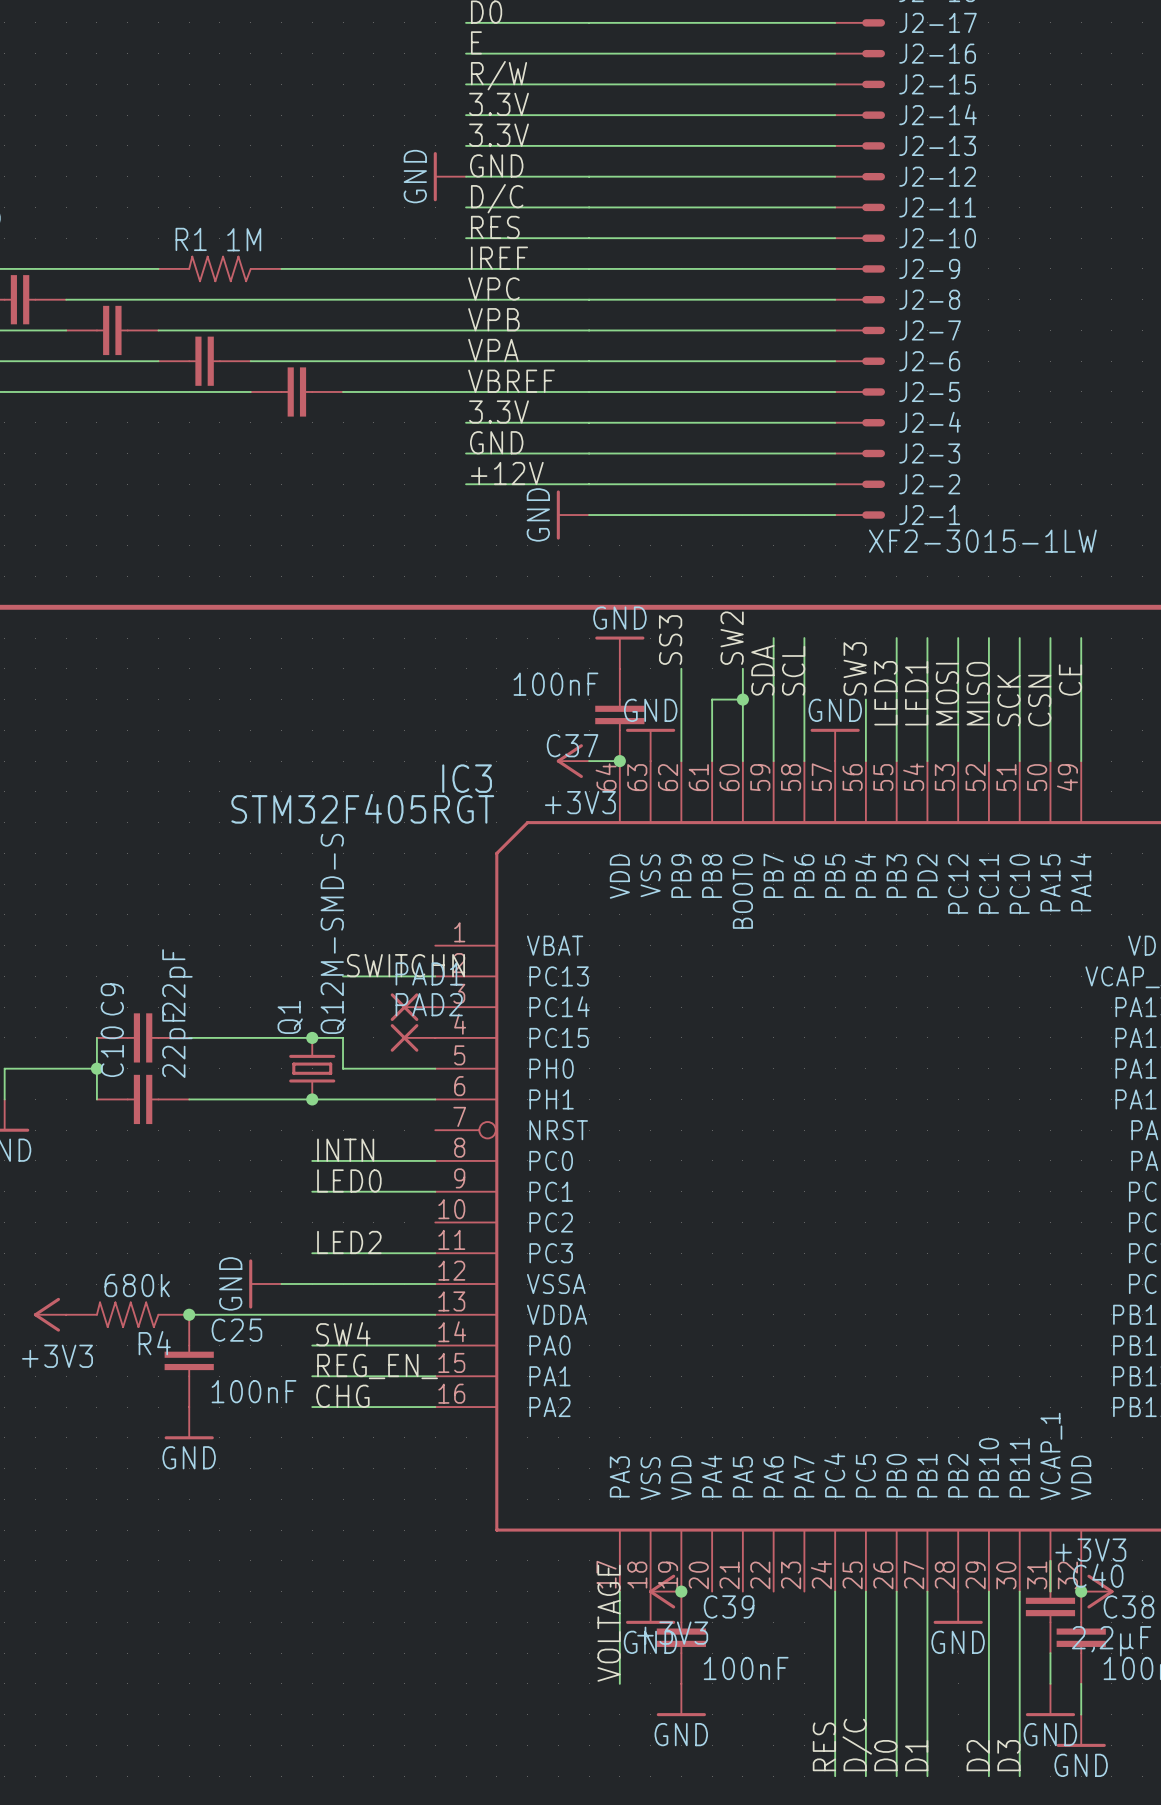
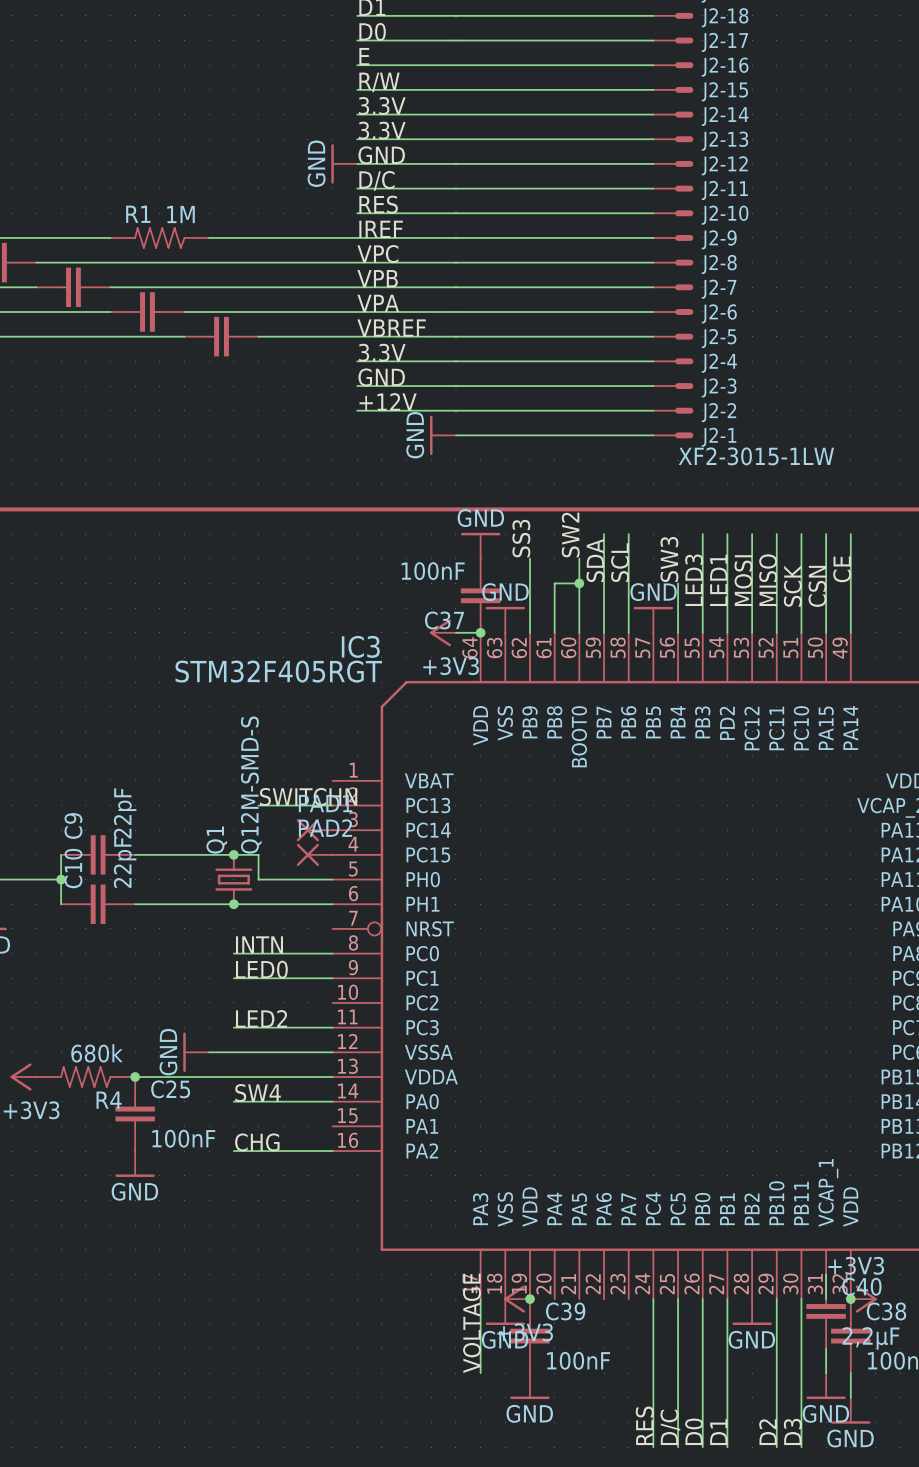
label: REG_EN_ (377, 1366) -> none
wire: (312, 1376) (435, 1376) -> none

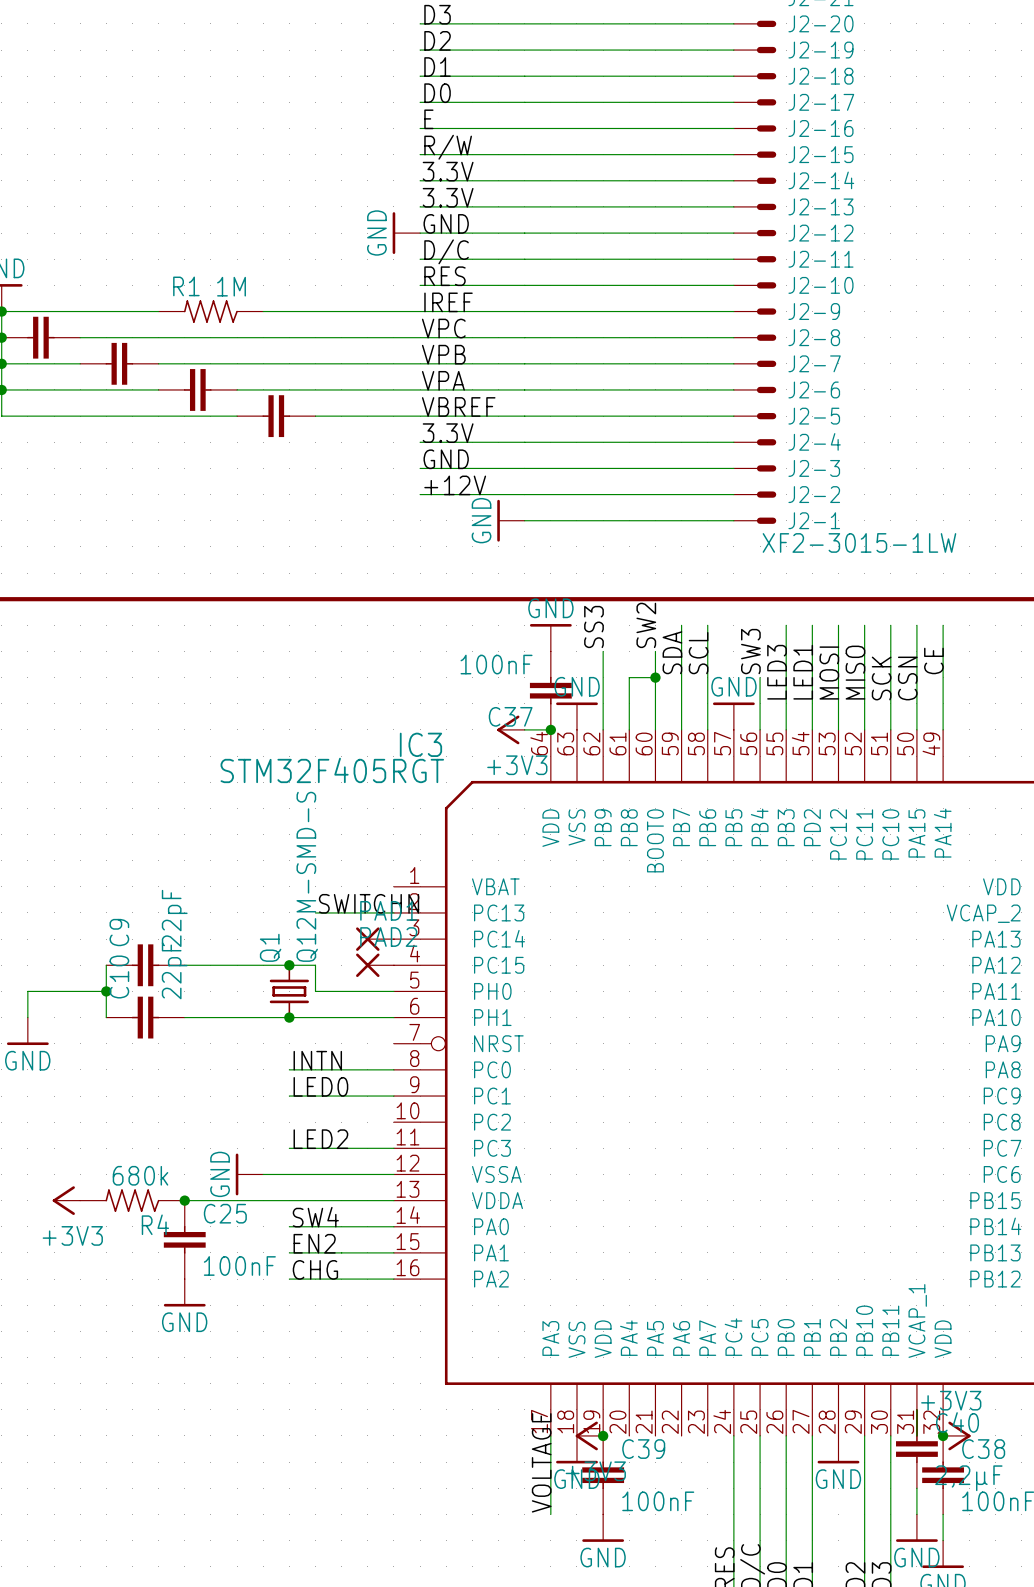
label: none -> EN2 (314, 1243)
wire: none -> (289, 1252) (393, 1252)

